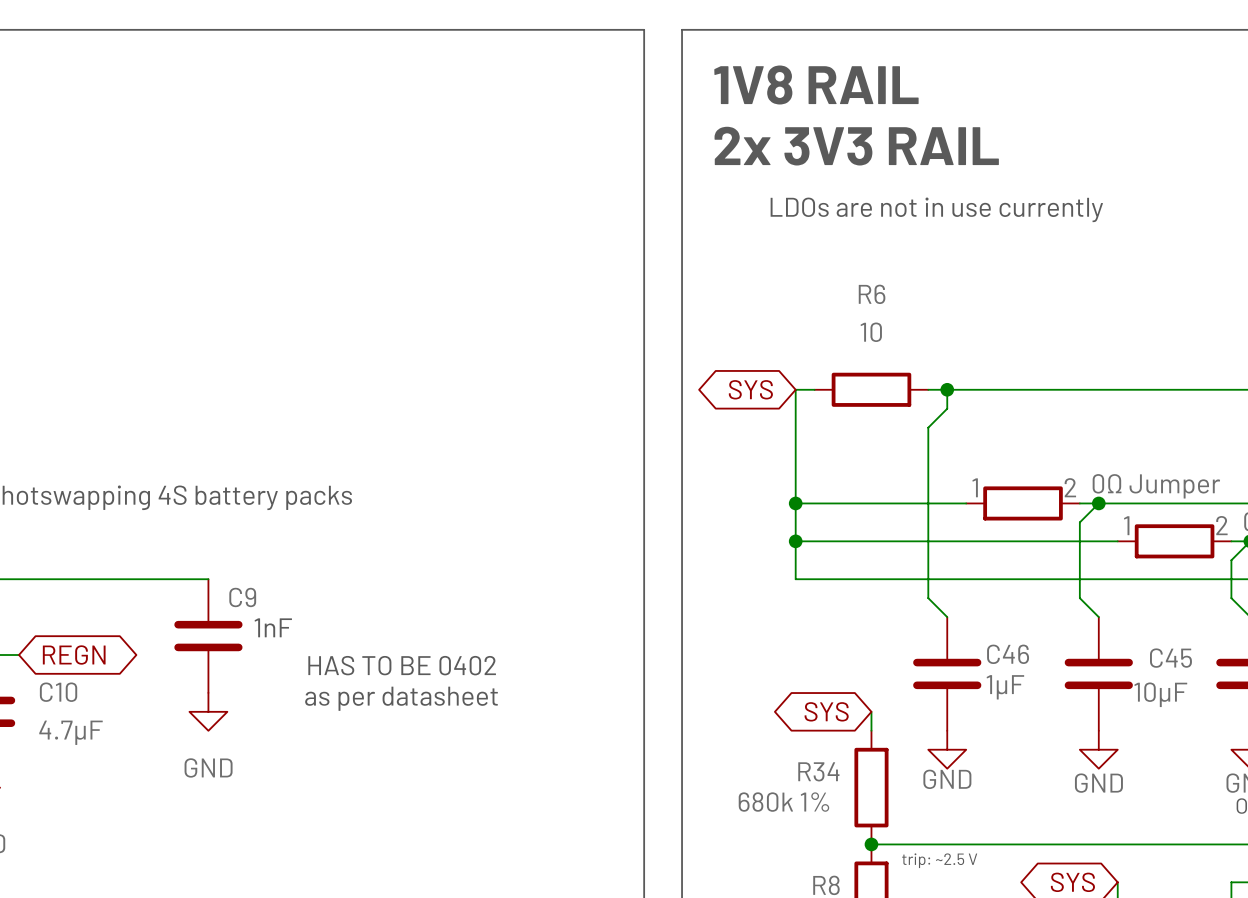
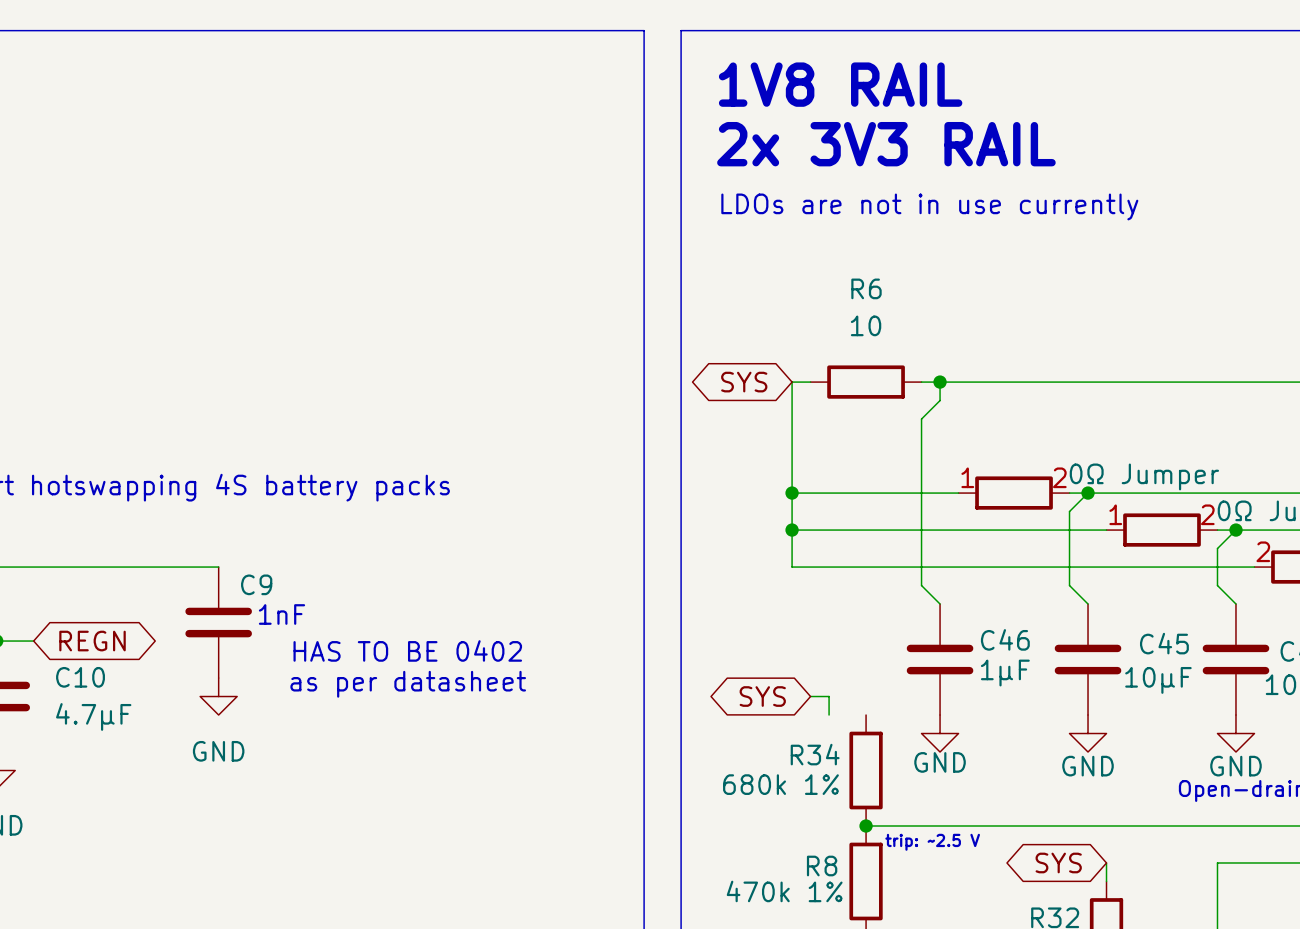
wire: none -> (810, 696) (829, 696) (829, 715)
global label position: SYS (826, 711) -> SYS (762, 696)
wire: (871, 711) (871, 730) -> none

